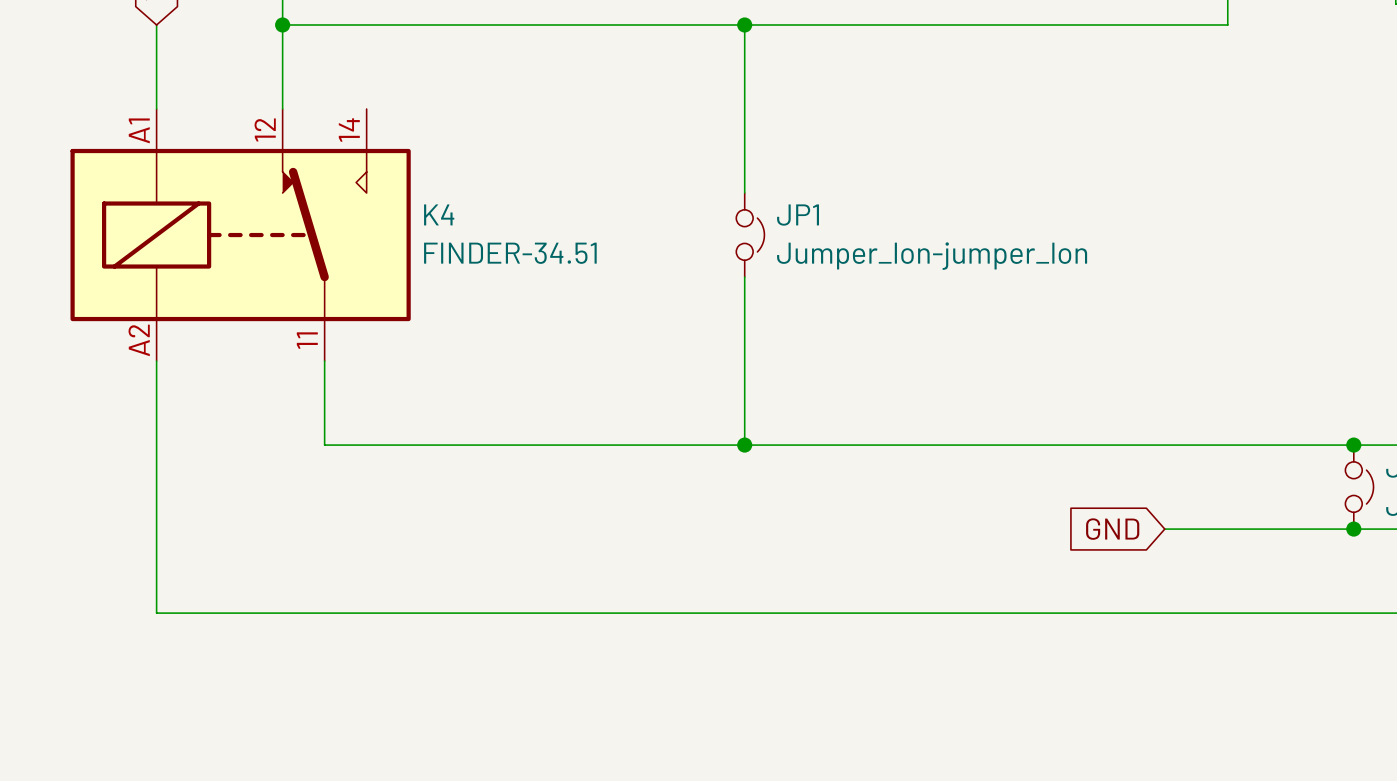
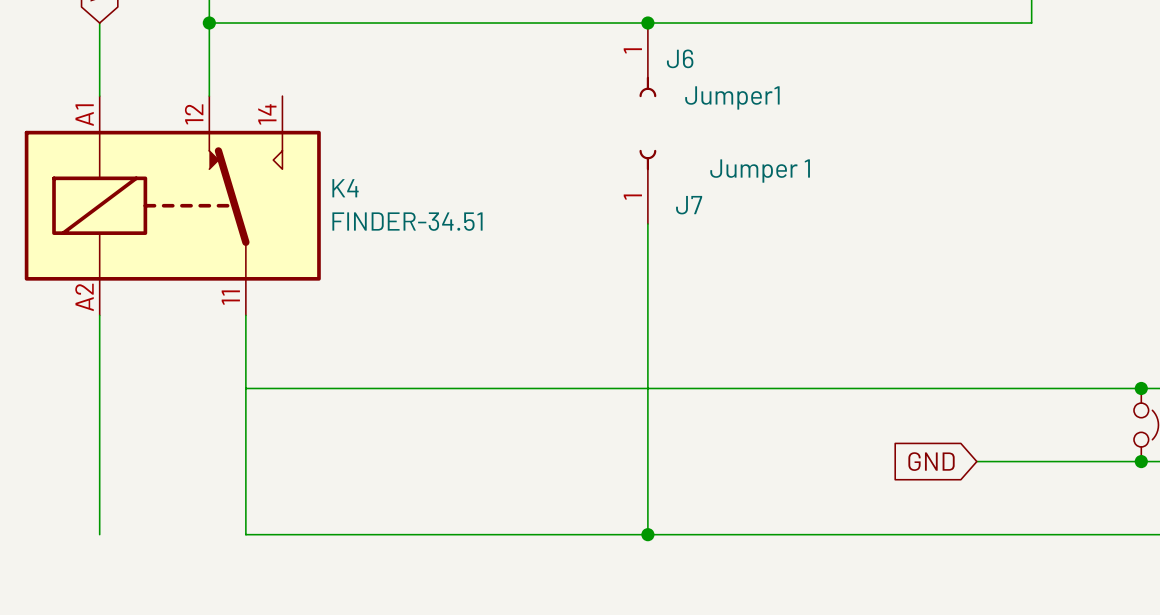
wire: (744, 24) (744, 193) -> none
junction position: (744, 24) -> (647, 23)
J6: none -> Jumper1 (647, 60)
J7: none -> Jumper 1 (647, 186)
JP1: Jumper_lon-jumper_lon (750, 235) -> none
wire: none -> (647, 224) (647, 534)
wire: (744, 277) (744, 445) -> none
junction: (744, 445) -> none
wire: (156, 613) (324, 613) -> (245, 388) (245, 534)
junction: none -> (647, 534)

